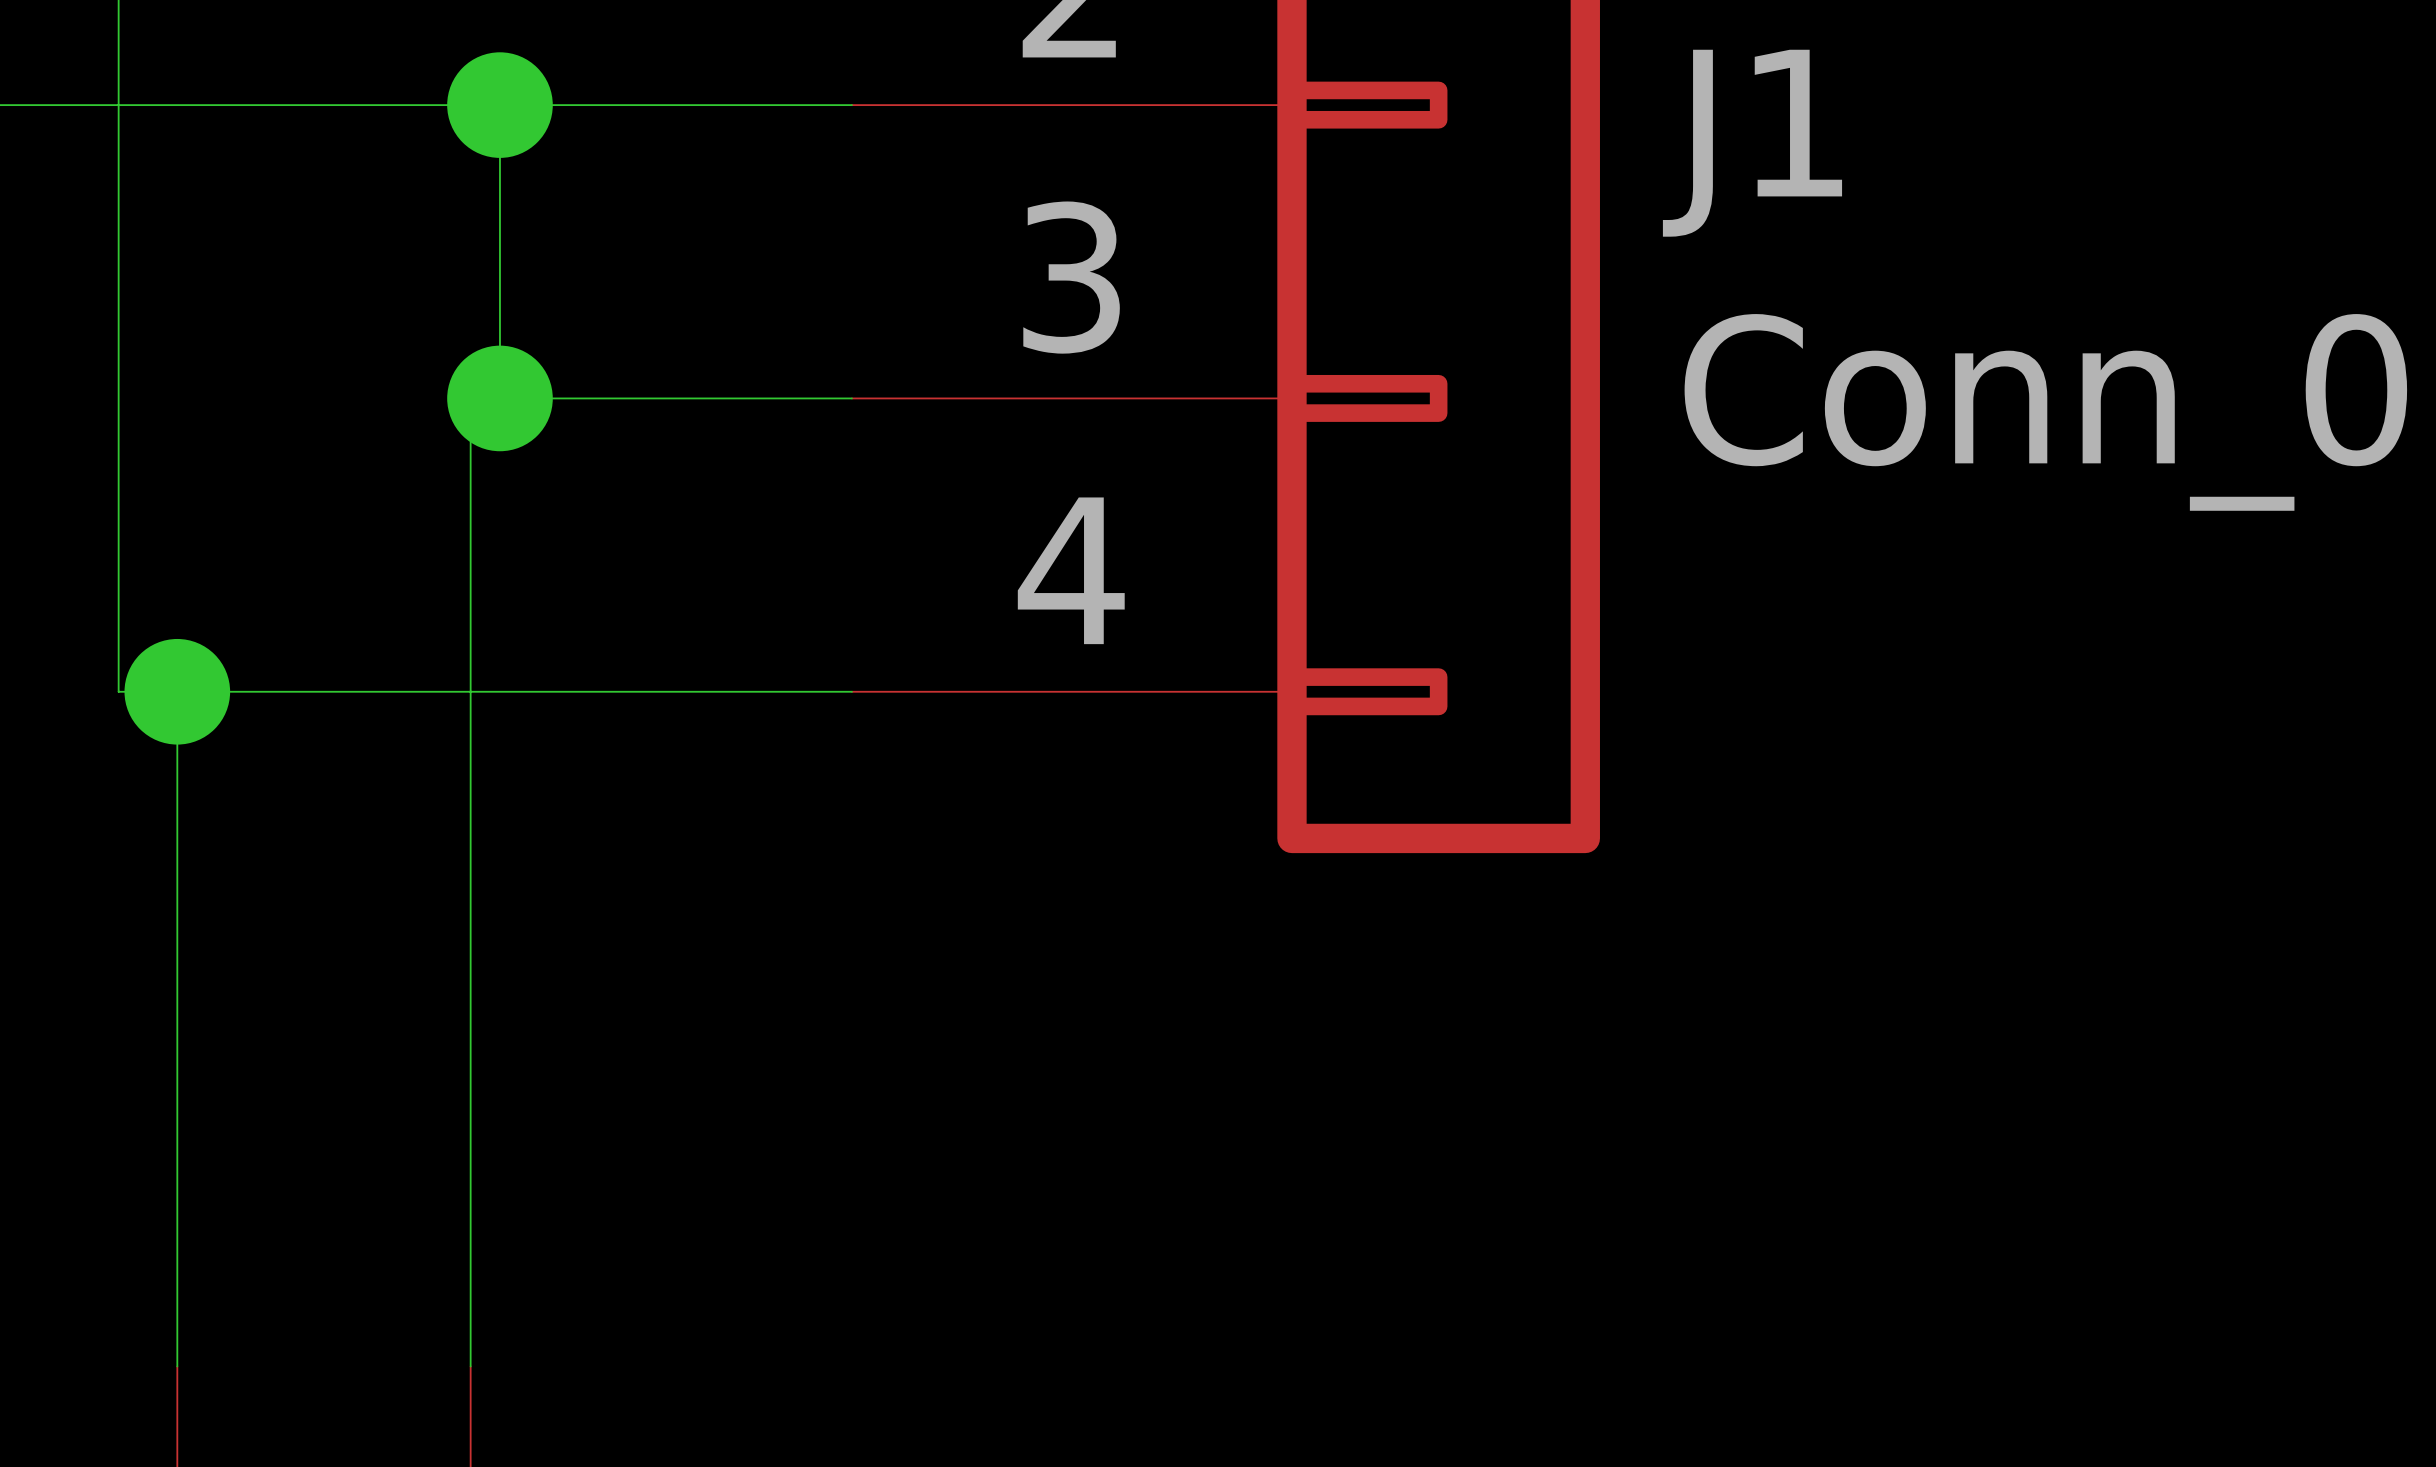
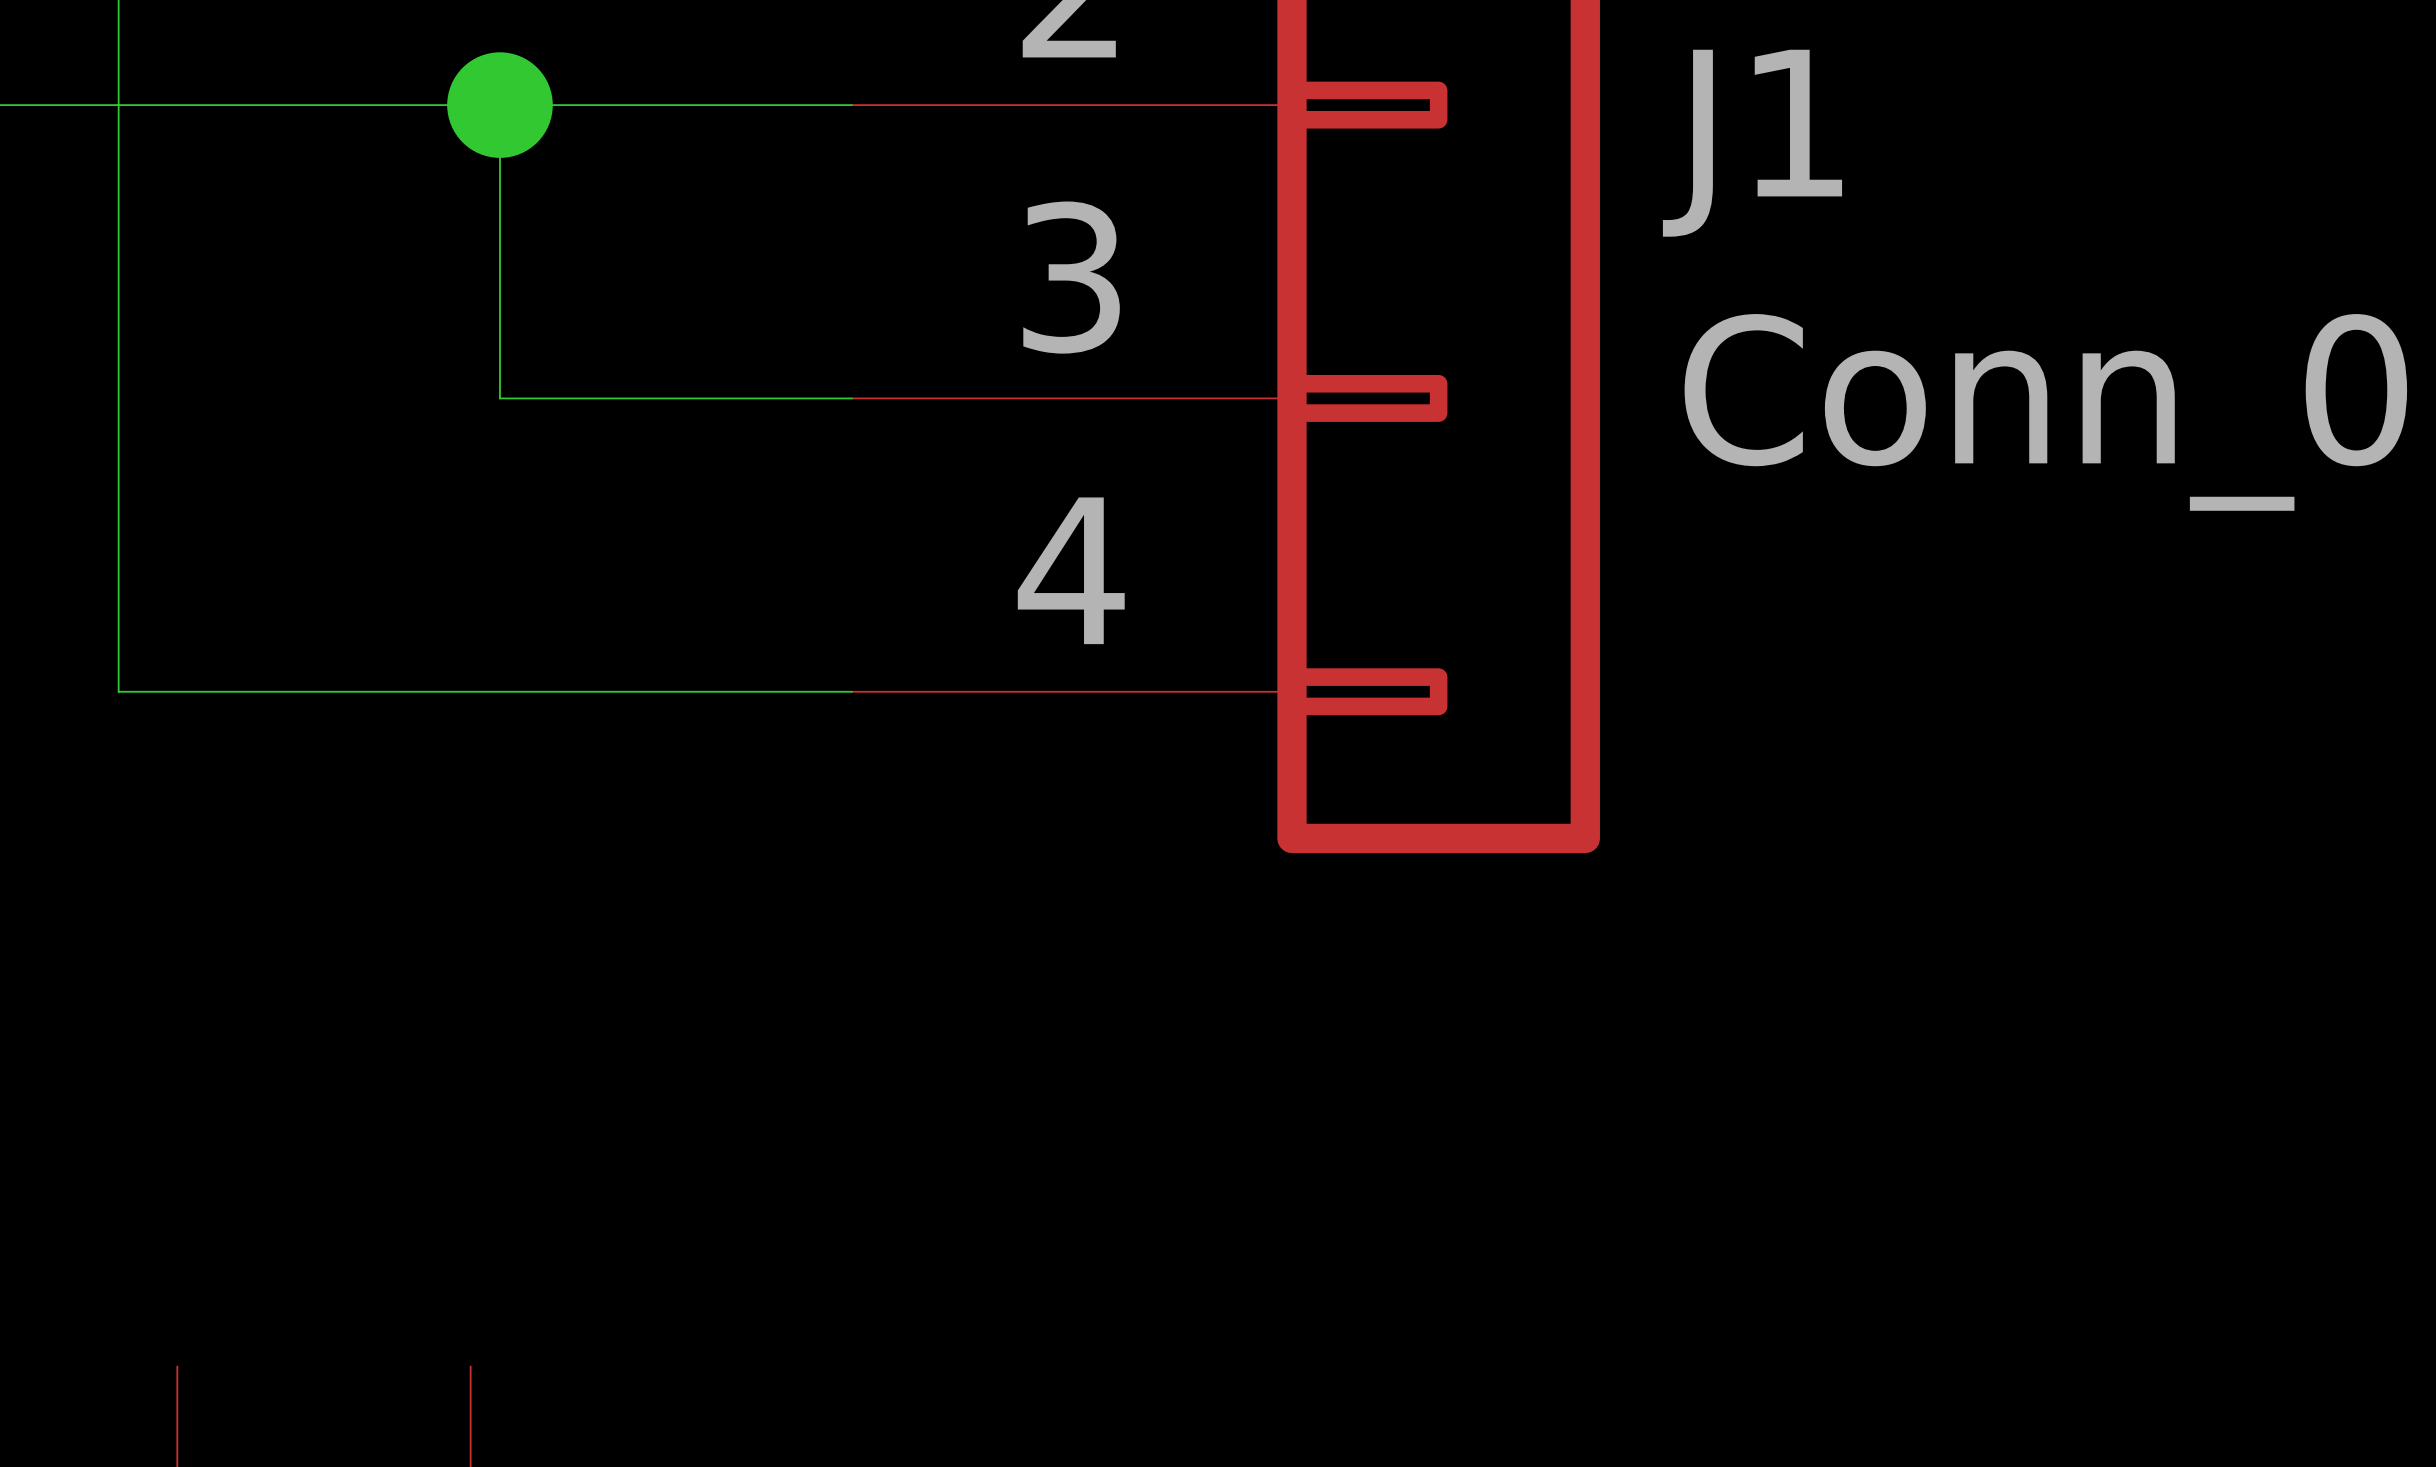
wire: (499, 398) (470, 398) (470, 1366) -> none
junction: (499, 398) -> none
wire: (177, 691) (177, 1366) -> none
junction: (177, 691) -> none

